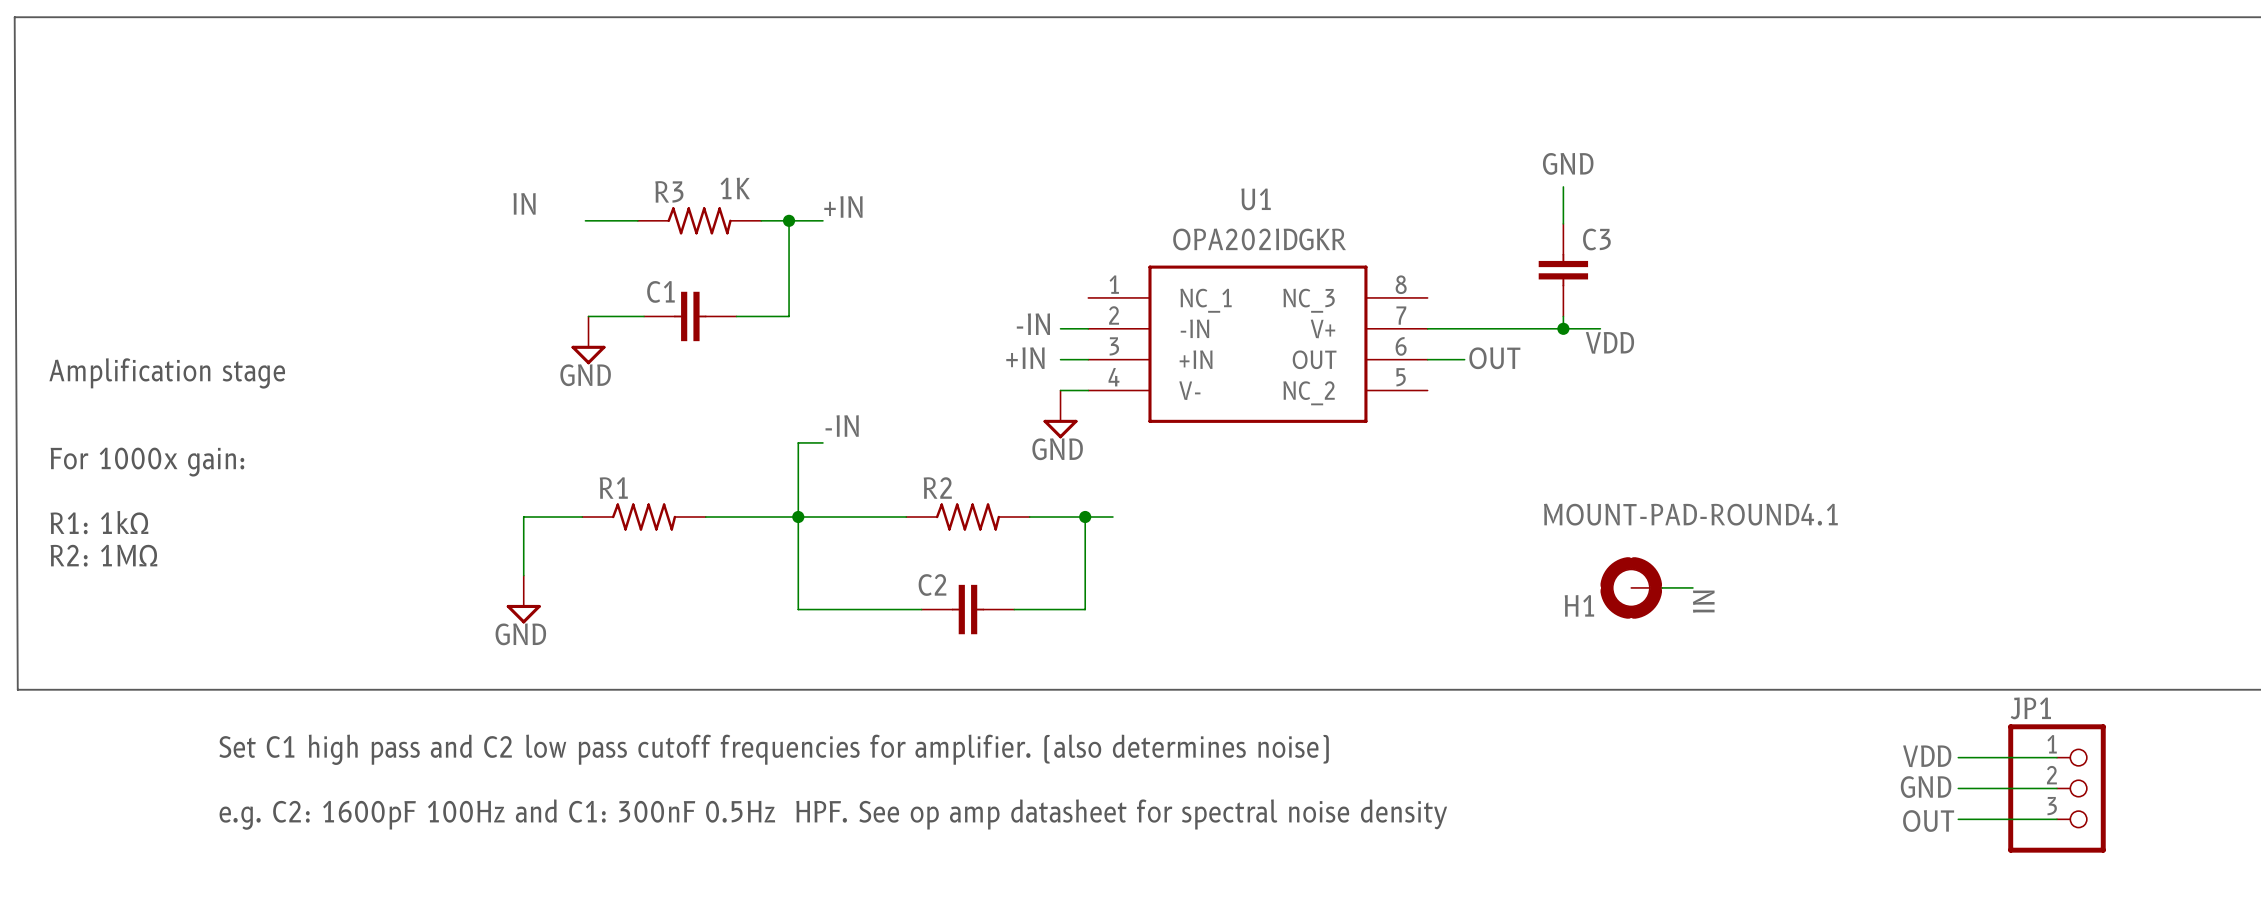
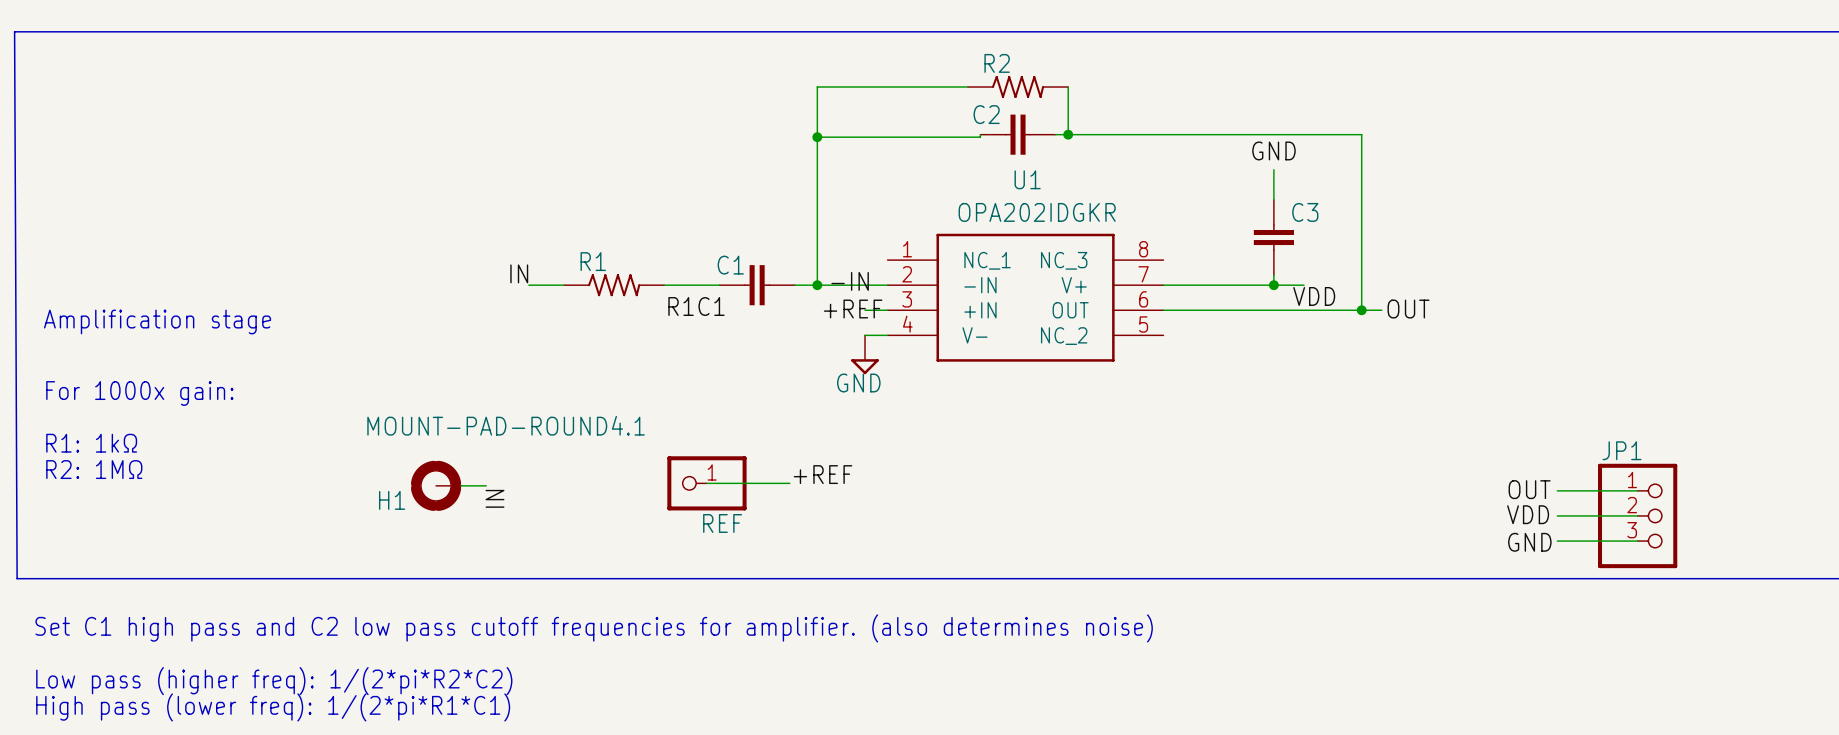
wire: none -> (967, 87) (817, 87) (817, 285)
wire: none -> (1068, 87) (1068, 134)
wire: none -> (980, 134) (980, 137) (817, 137)
wire: none -> (1055, 134) (1361, 134) (1361, 310)
junction: none -> (1068, 134)
junction: none -> (817, 137)
label position: IN (524, 203) -> IN (519, 273)
label: +IN (843, 206) -> none
wire: (585, 220) (637, 220) -> none
R3: 1K (699, 220) -> none
wire: (761, 220) (822, 220) -> none
wire: (789, 220) (789, 316) (736, 316) -> none
junction: (789, 220) -> none
wire: (588, 316) (644, 316) -> none
C1 position: (690, 316) -> (757, 285)
wire: none -> (528, 285) (563, 285)
wire: none -> (664, 285) (719, 285)
wire: none -> (794, 285) (865, 285)
junction: none -> (817, 285)
power symbol: GND (588, 340) -> none
label: none -> R1C1 (696, 306)
label: +IN (1025, 358) -> +REF (853, 309)
label position: OUT (1494, 358) -> OUT (1408, 309)
wire: none -> (1193, 310) (1381, 310)
junction: none -> (1361, 310)
label: -IN (842, 425) -> none
wire: (822, 442) (798, 442) (798, 609) (921, 609) -> none
wire: (582, 517) (523, 517) (523, 575) -> none
R1 position: (644, 517) -> (614, 285)
wire: (705, 517) (906, 517) -> none
junction: (798, 517) -> none
R2 position: (967, 517) -> (1018, 87)
wire: (1029, 517) (1112, 517) -> none
wire: (1085, 517) (1085, 609) (1014, 609) -> none
junction: (1085, 517) -> none
label: none -> +REF (823, 474)
wire: none -> (706, 483) (789, 483)
REF: none -> (706, 483)
wire: none -> (461, 485) (486, 485)
label: none -> OUT (1529, 489)
H1 position: (1631, 587) -> (436, 485)
wire: (1662, 587) (1692, 587) -> none
label: none -> IN (494, 498)
power symbol: GND (523, 599) -> none
label: IN (1703, 601) -> none
C2 position: (967, 609) -> (1018, 134)
text position: Set C1 high pass and C2 low pass cutoff frequencies for amplifier. (also determines noise) (774, 749) -> Set C1 high pass and C2 low pass cutoff frequencies for amplifier. (also determines noise) (594, 628)
label position: VDD (1927, 756) -> VDD (1528, 514)
wire: (1958, 757) (2056, 757) -> (1557, 490) (1637, 490)
label position: GND (1926, 787) -> GND (1529, 542)
wire: (1958, 788) (2056, 788) -> (1557, 515) (1637, 515)
JP1 position: (2056, 788) -> (1637, 515)
text: e.g. C2: 1600pF 100Hz and C1: 300nF 0.5Hz HPF. See op amp datasheet for spectral noise density (833, 814) -> none
text: none -> Low pass (higher freq): 1/(2*pi*R2*C2) (274, 681)
wire: (1958, 819) (2056, 819) -> (1557, 541) (1637, 541)
label: OUT (1928, 820) -> none
text: none -> High pass (lower freq): 1/(2*pi*R1*C1) (273, 707)

